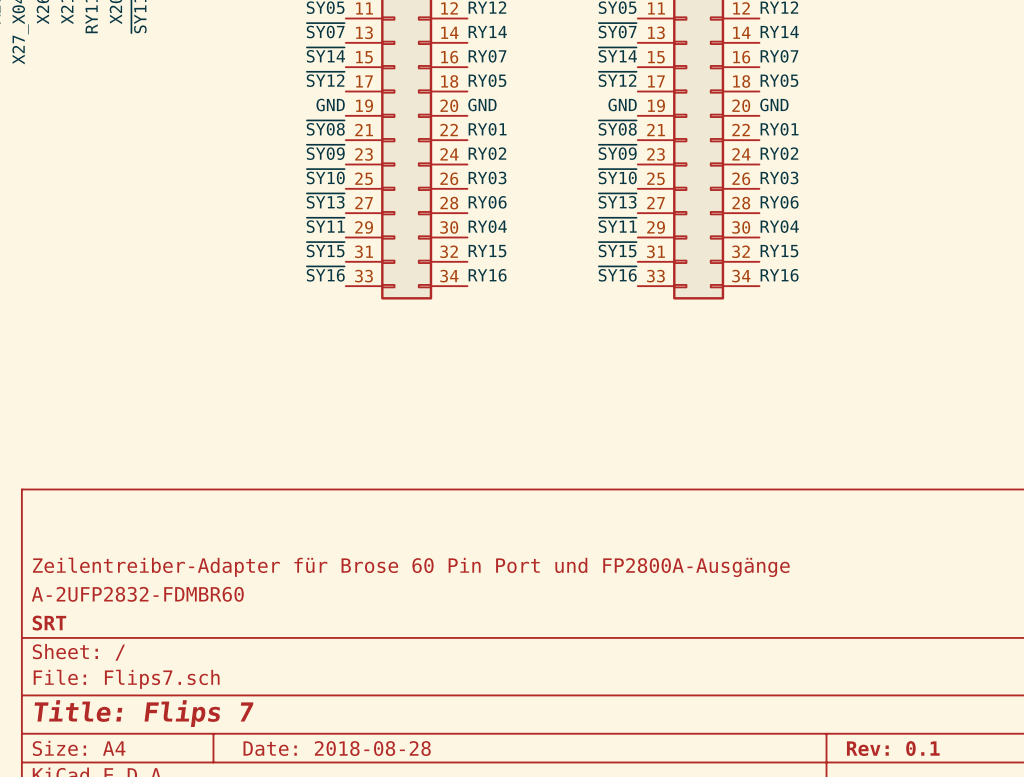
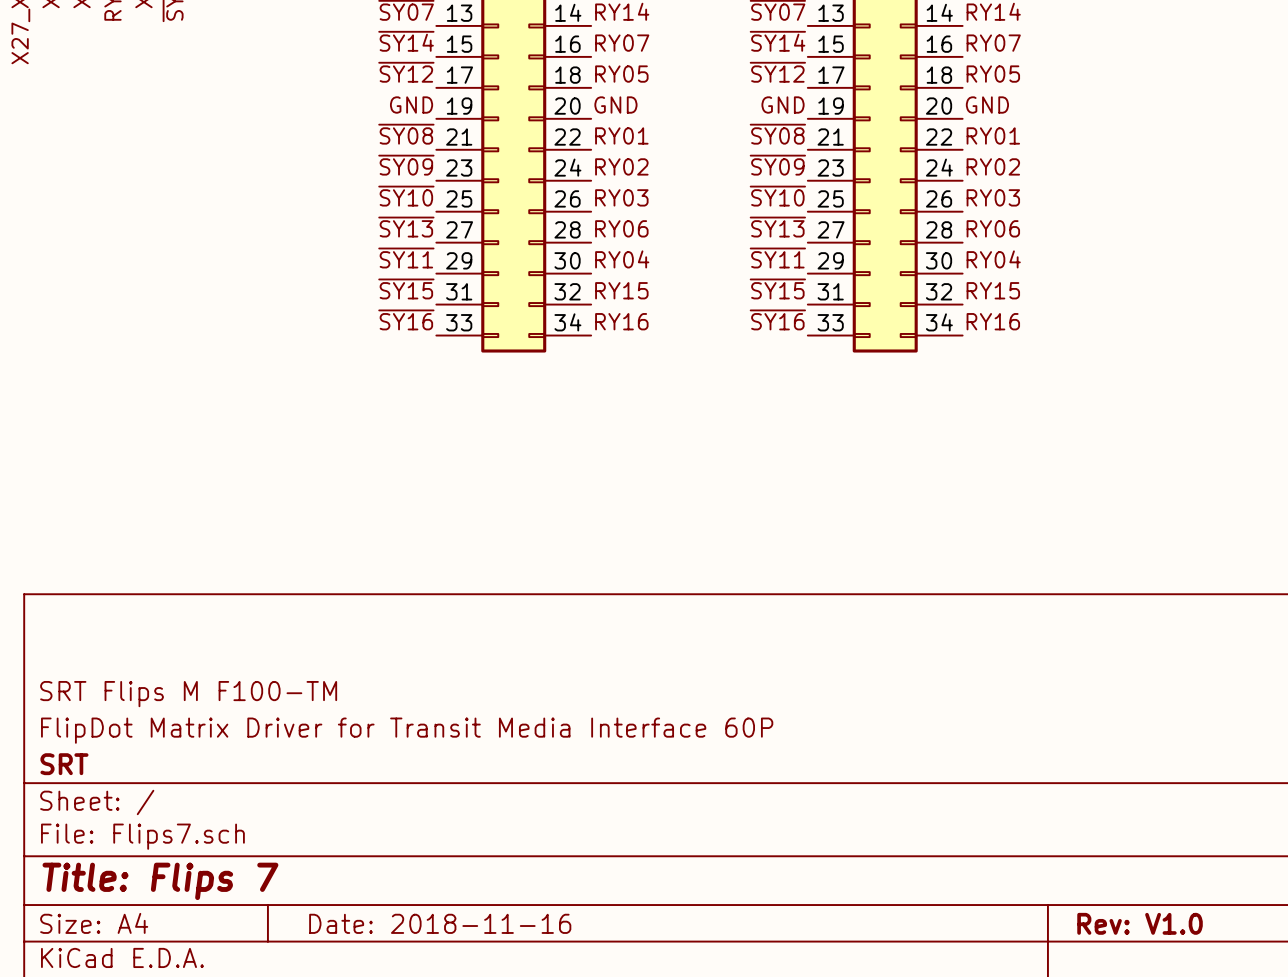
title block: Zeilentreiber-Adapter für Brose 60 Pin Port und FP2800A-Ausgänge (411, 567) -> SRT Flips M F100-TM (188, 694)
title block: A-2UFP2832-FDMBR60 (137, 594) -> FlipDot Matrix Driver for Transit Media Interface 60P (407, 730)
title block: Date: 2018-08-28 (337, 748) -> Date: 2018-11-16 (440, 923)
title block: Rev: 0.1 (893, 748) -> Rev: V1.0 (1140, 923)

